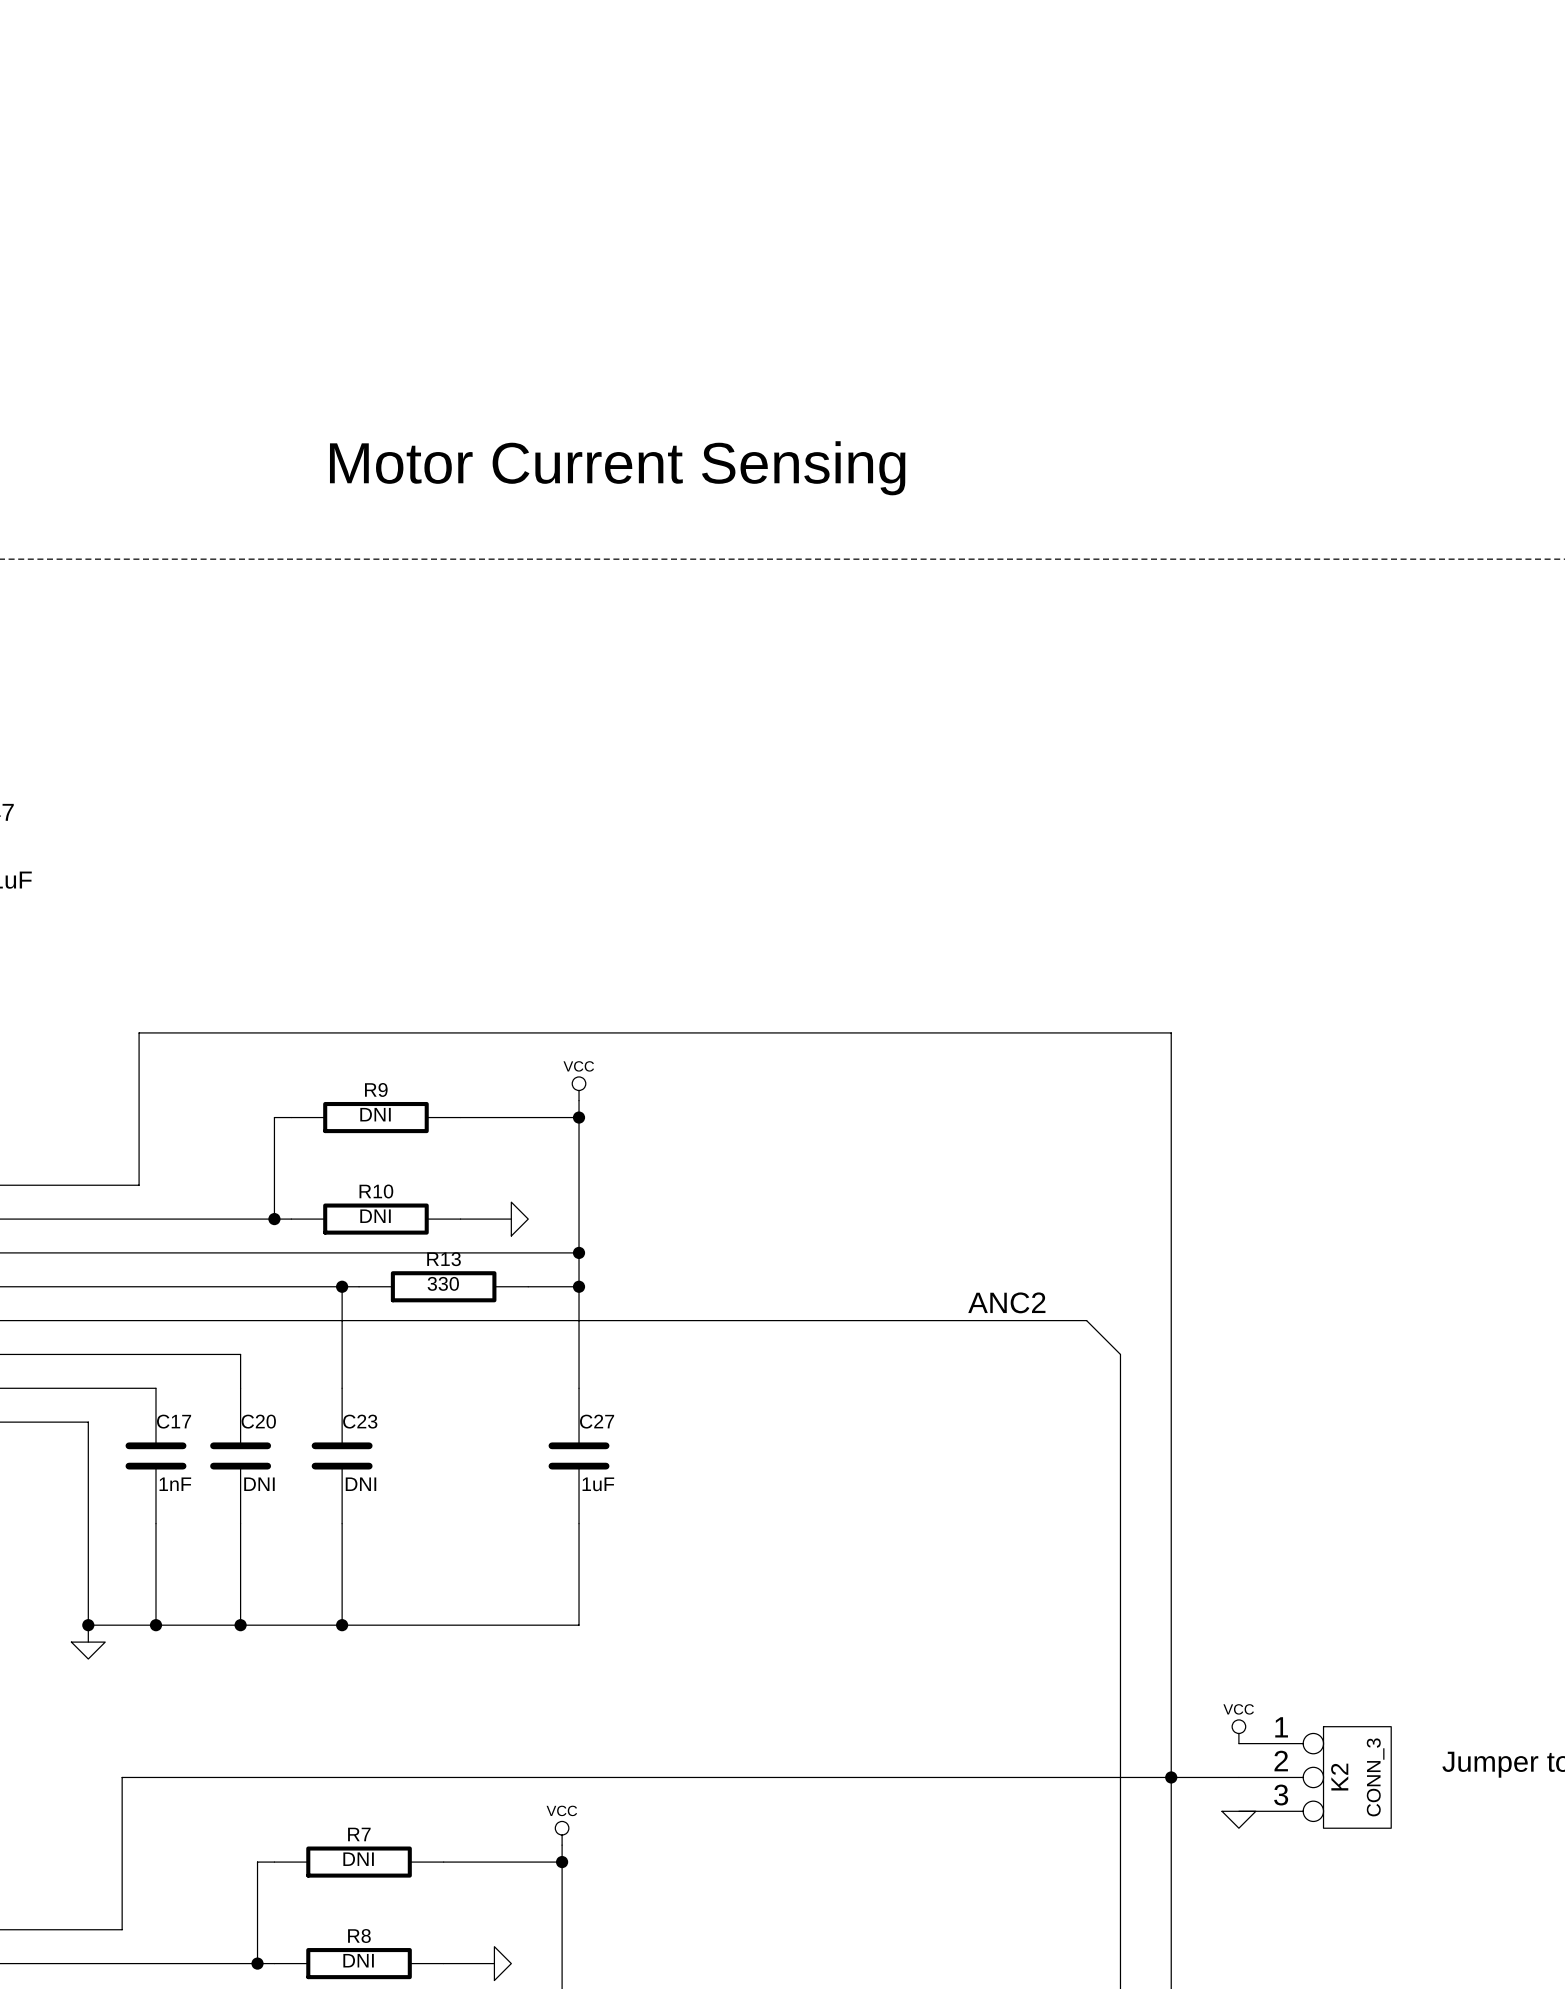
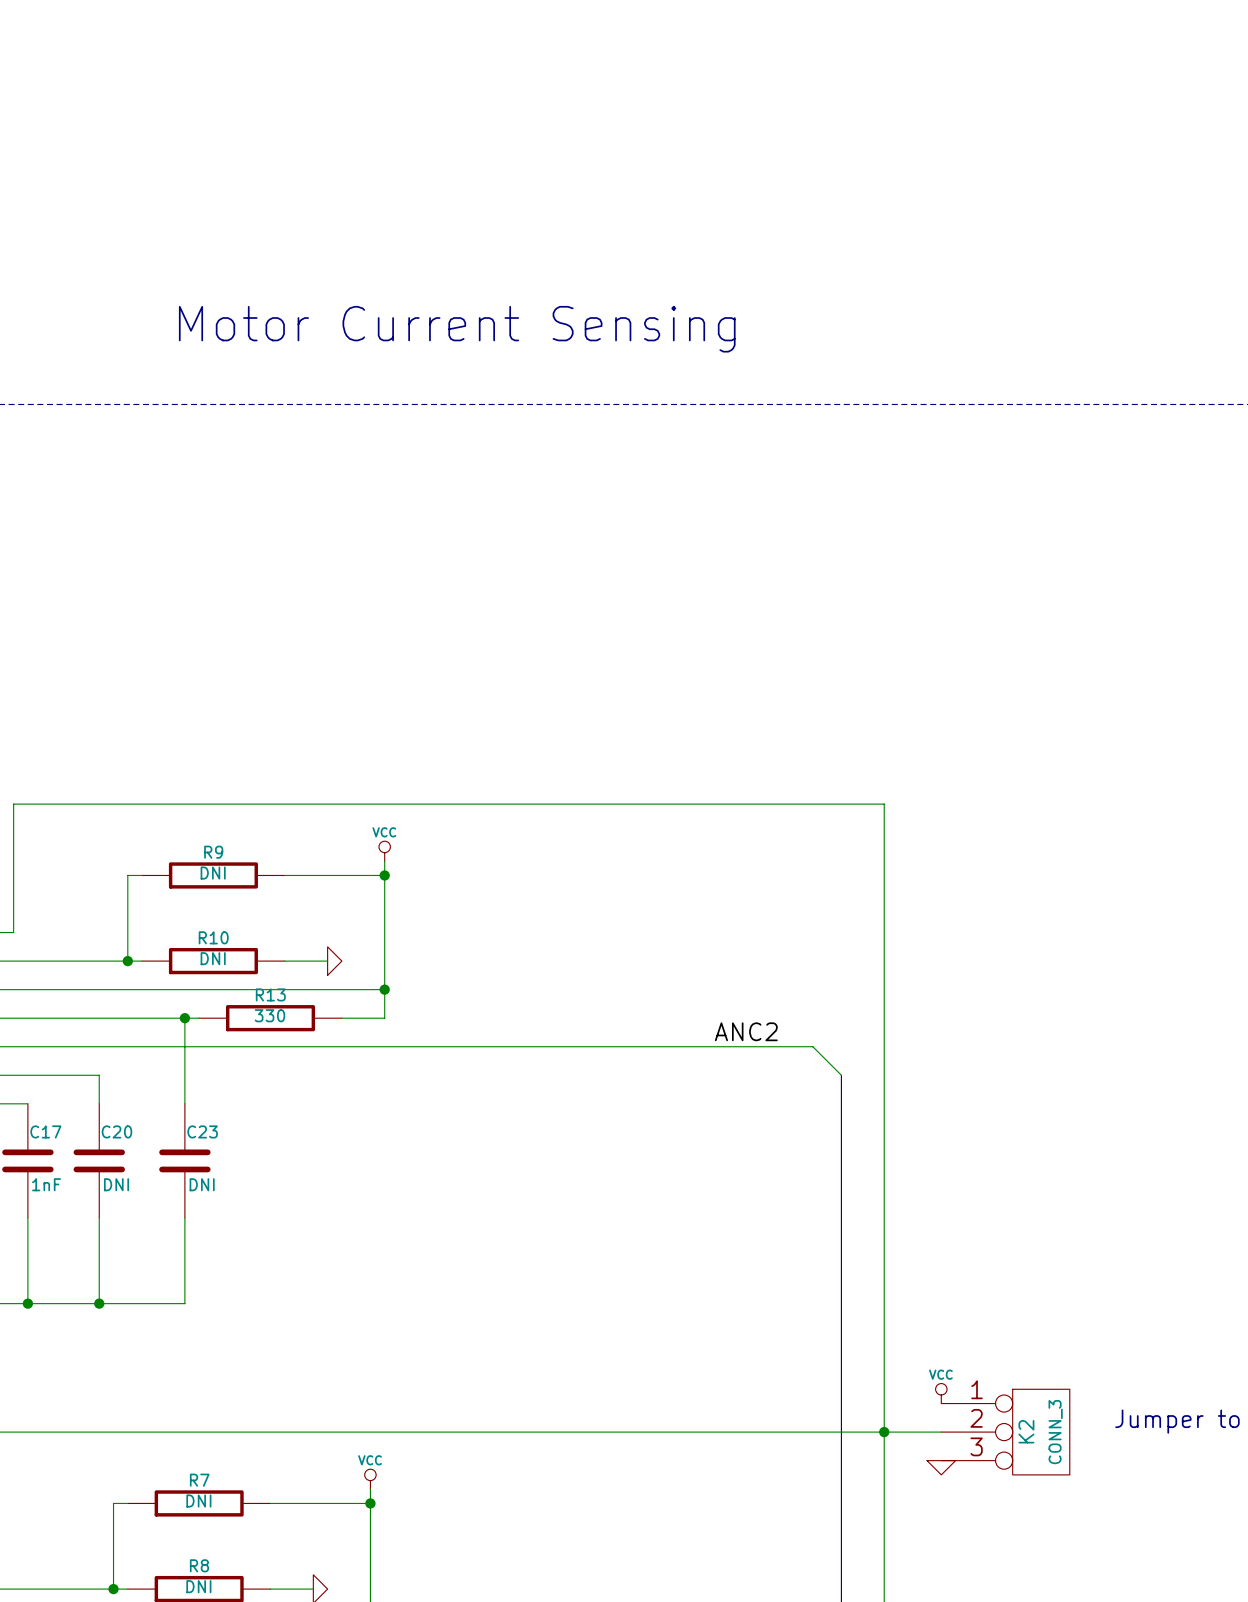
wire: (579, 1286) (579, 1388) -> none
junction: (579, 1286) -> none
C27: 1uF (579, 1455) -> none
wire: (579, 1523) (579, 1625) (342, 1625) -> none
junction: (342, 1625) -> none

